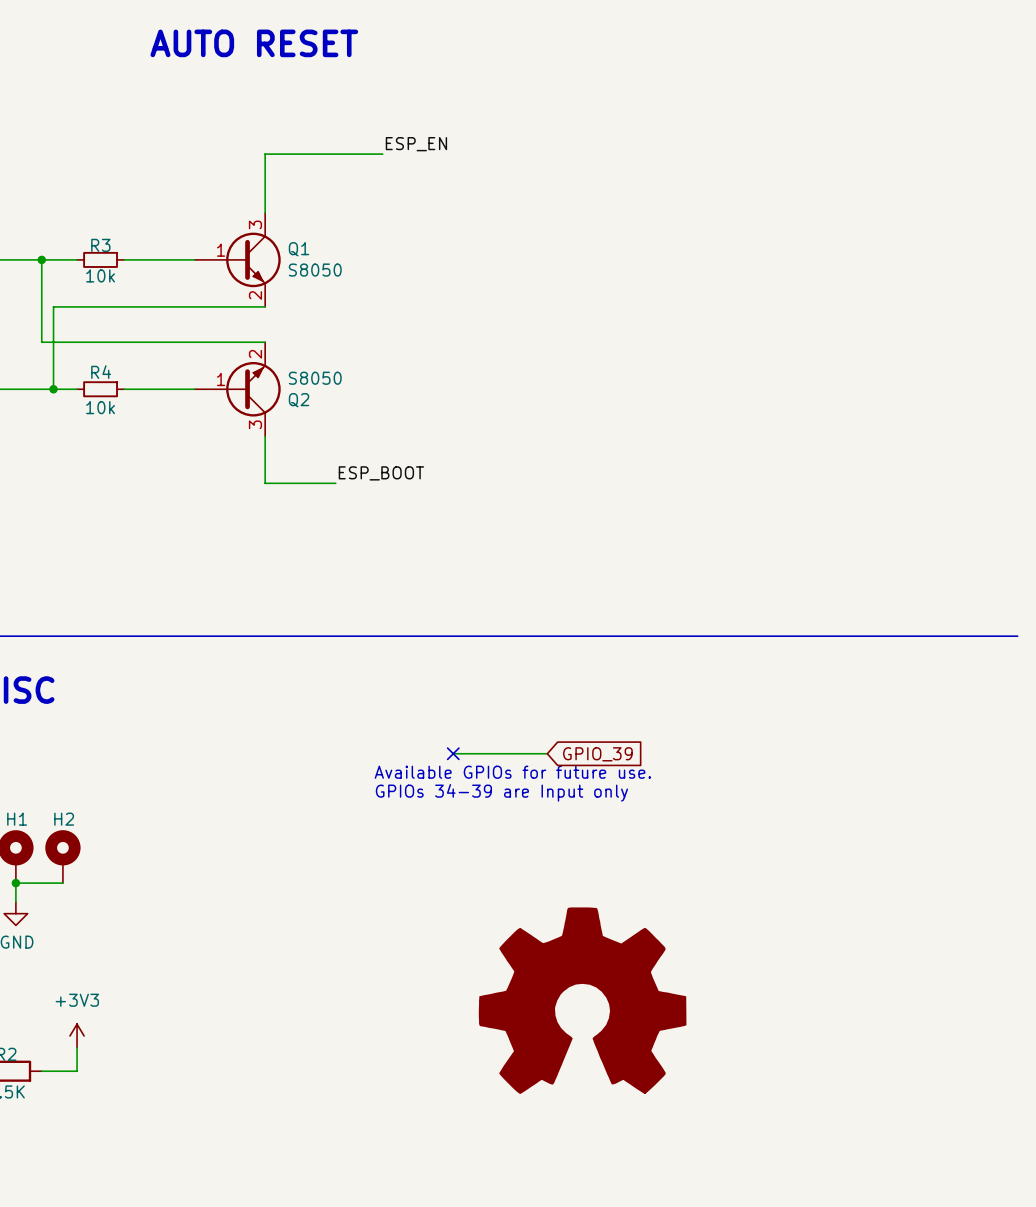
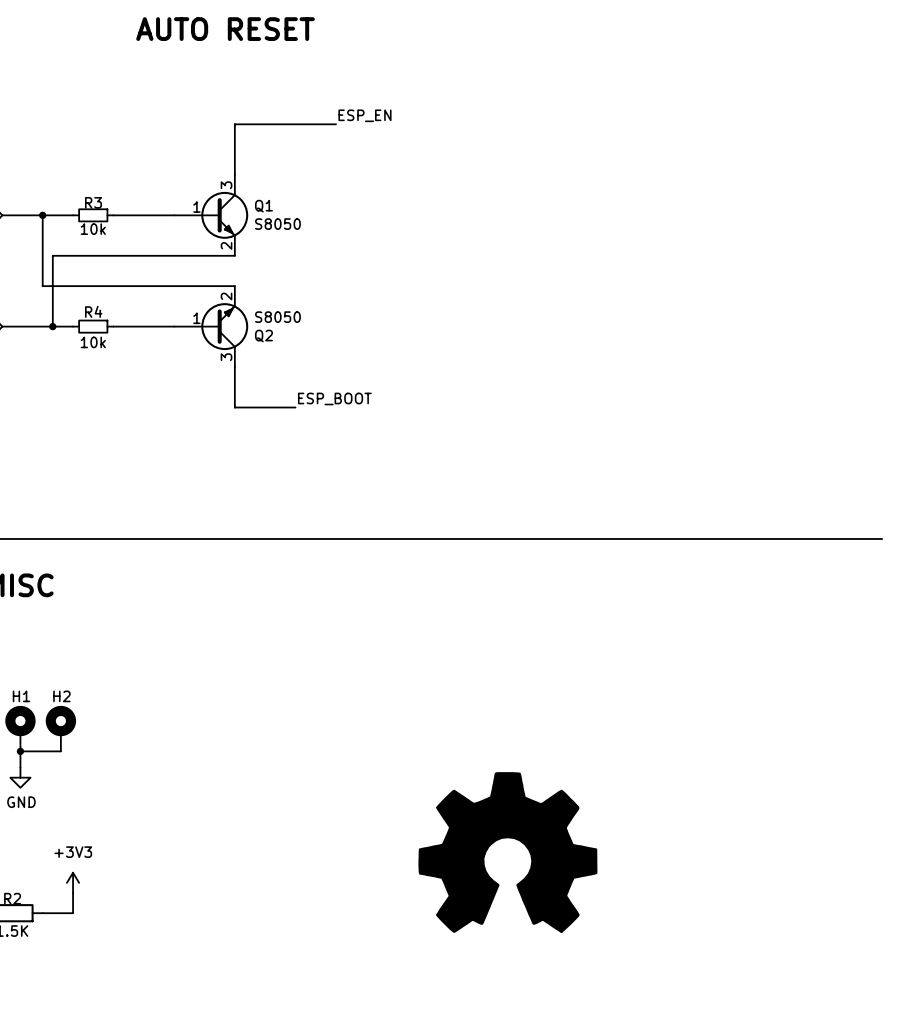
wire: (453, 753) (547, 753) -> none
no-connect mark: (453, 753) -> none
global label: GPIO_39 (597, 754) -> none
text: Available GPIOs for future use. (512, 772) -> none
text: GPIOs 34-39 are Input only (501, 792) -> none

